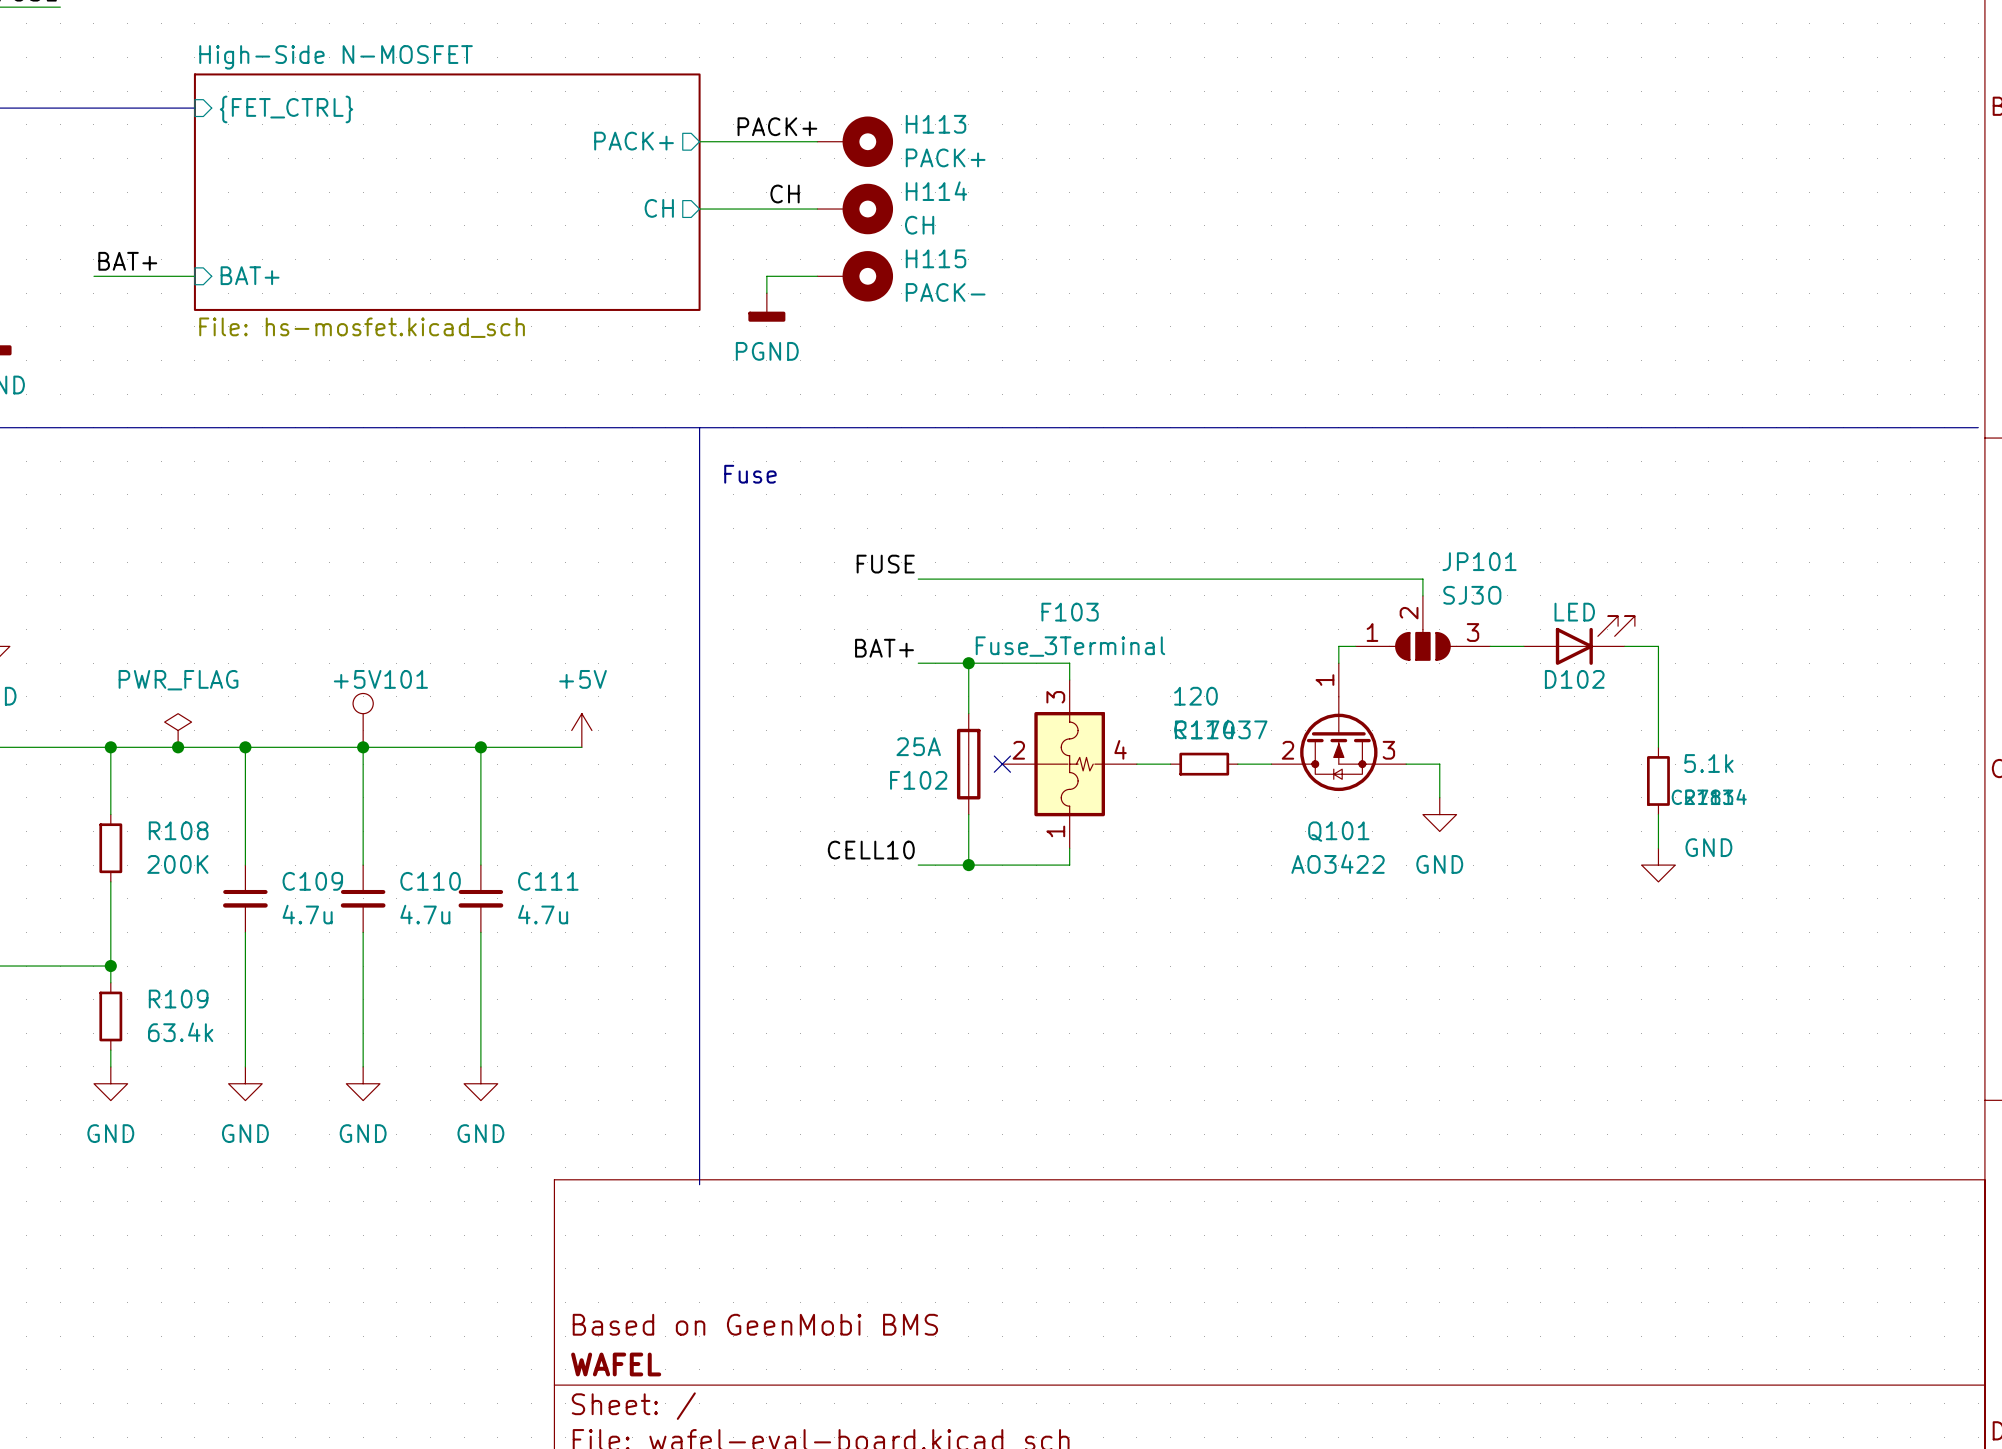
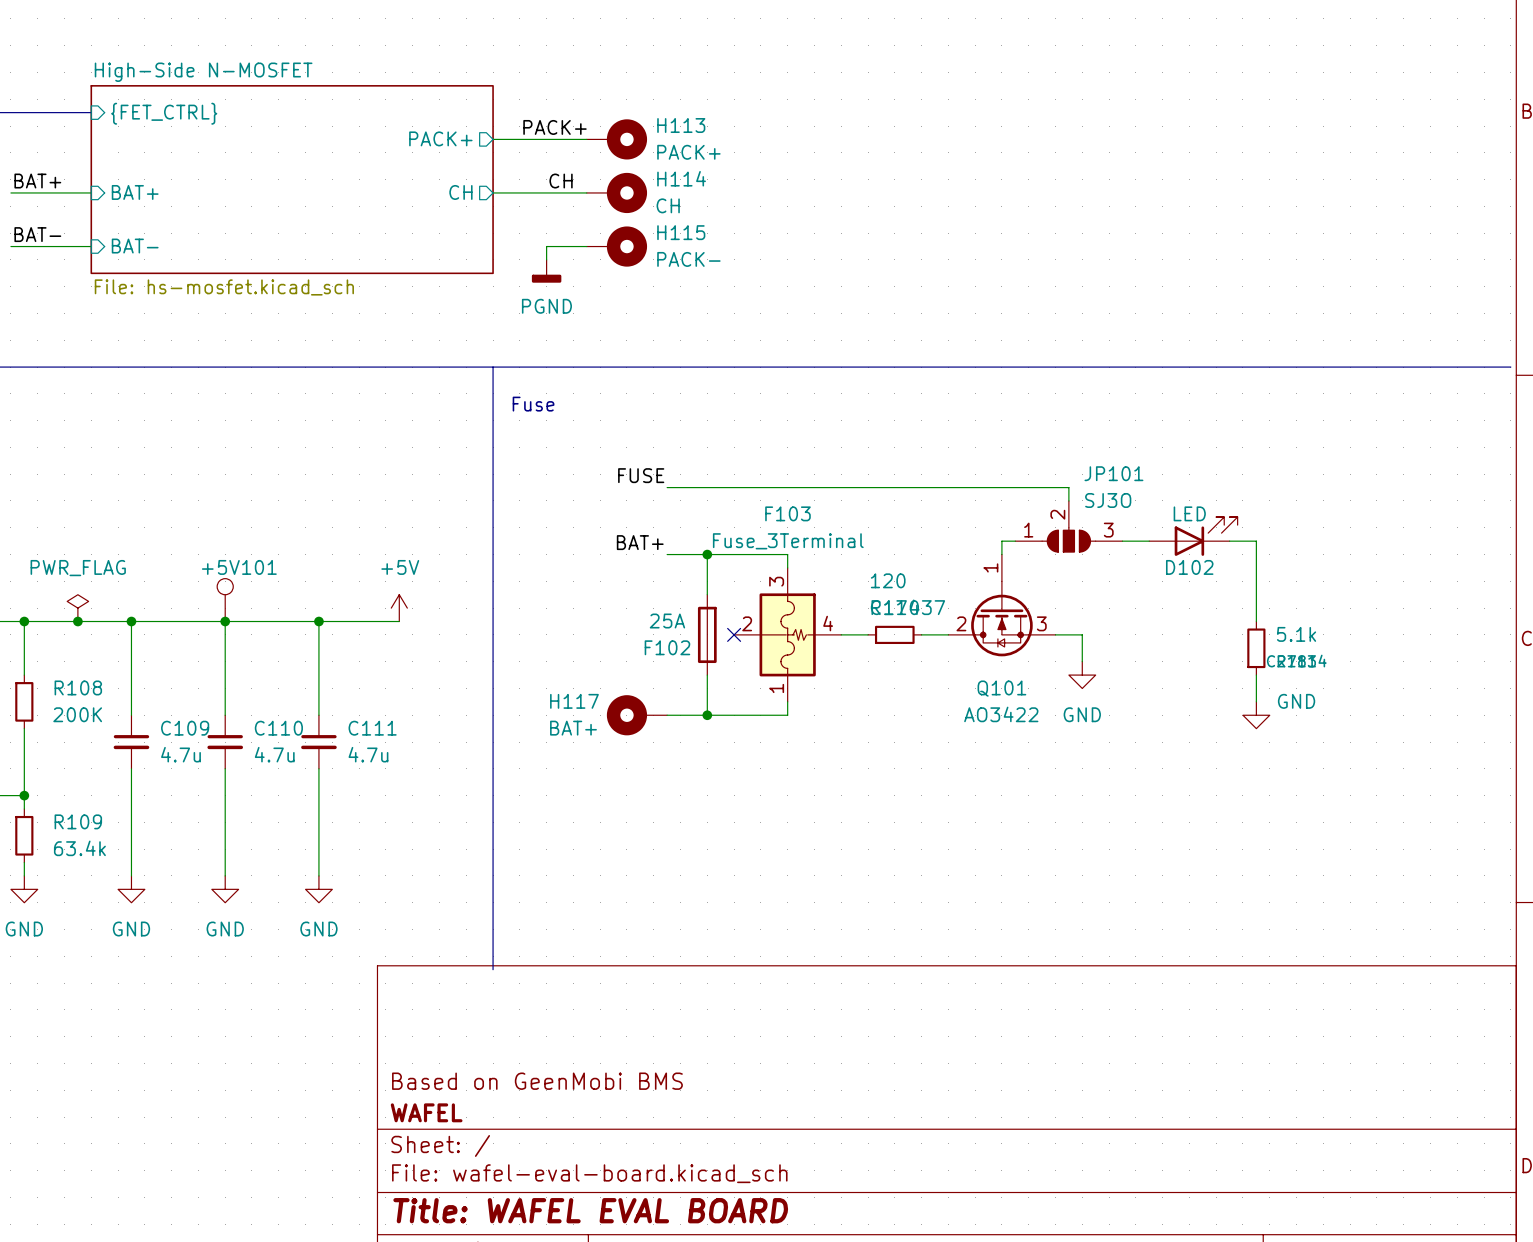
label: none -> BAT+ (37, 181)
sheet pin: none -> BAT+ (135, 192)
wire: none -> (10, 192) (91, 192)
label: BAT+ (127, 261) -> BAT- (37, 234)
sheet pin: BAT+ (250, 275) -> BAT- (135, 246)
label: CELL10 (871, 850) -> none
H117: none -> BAT+ (637, 715)

